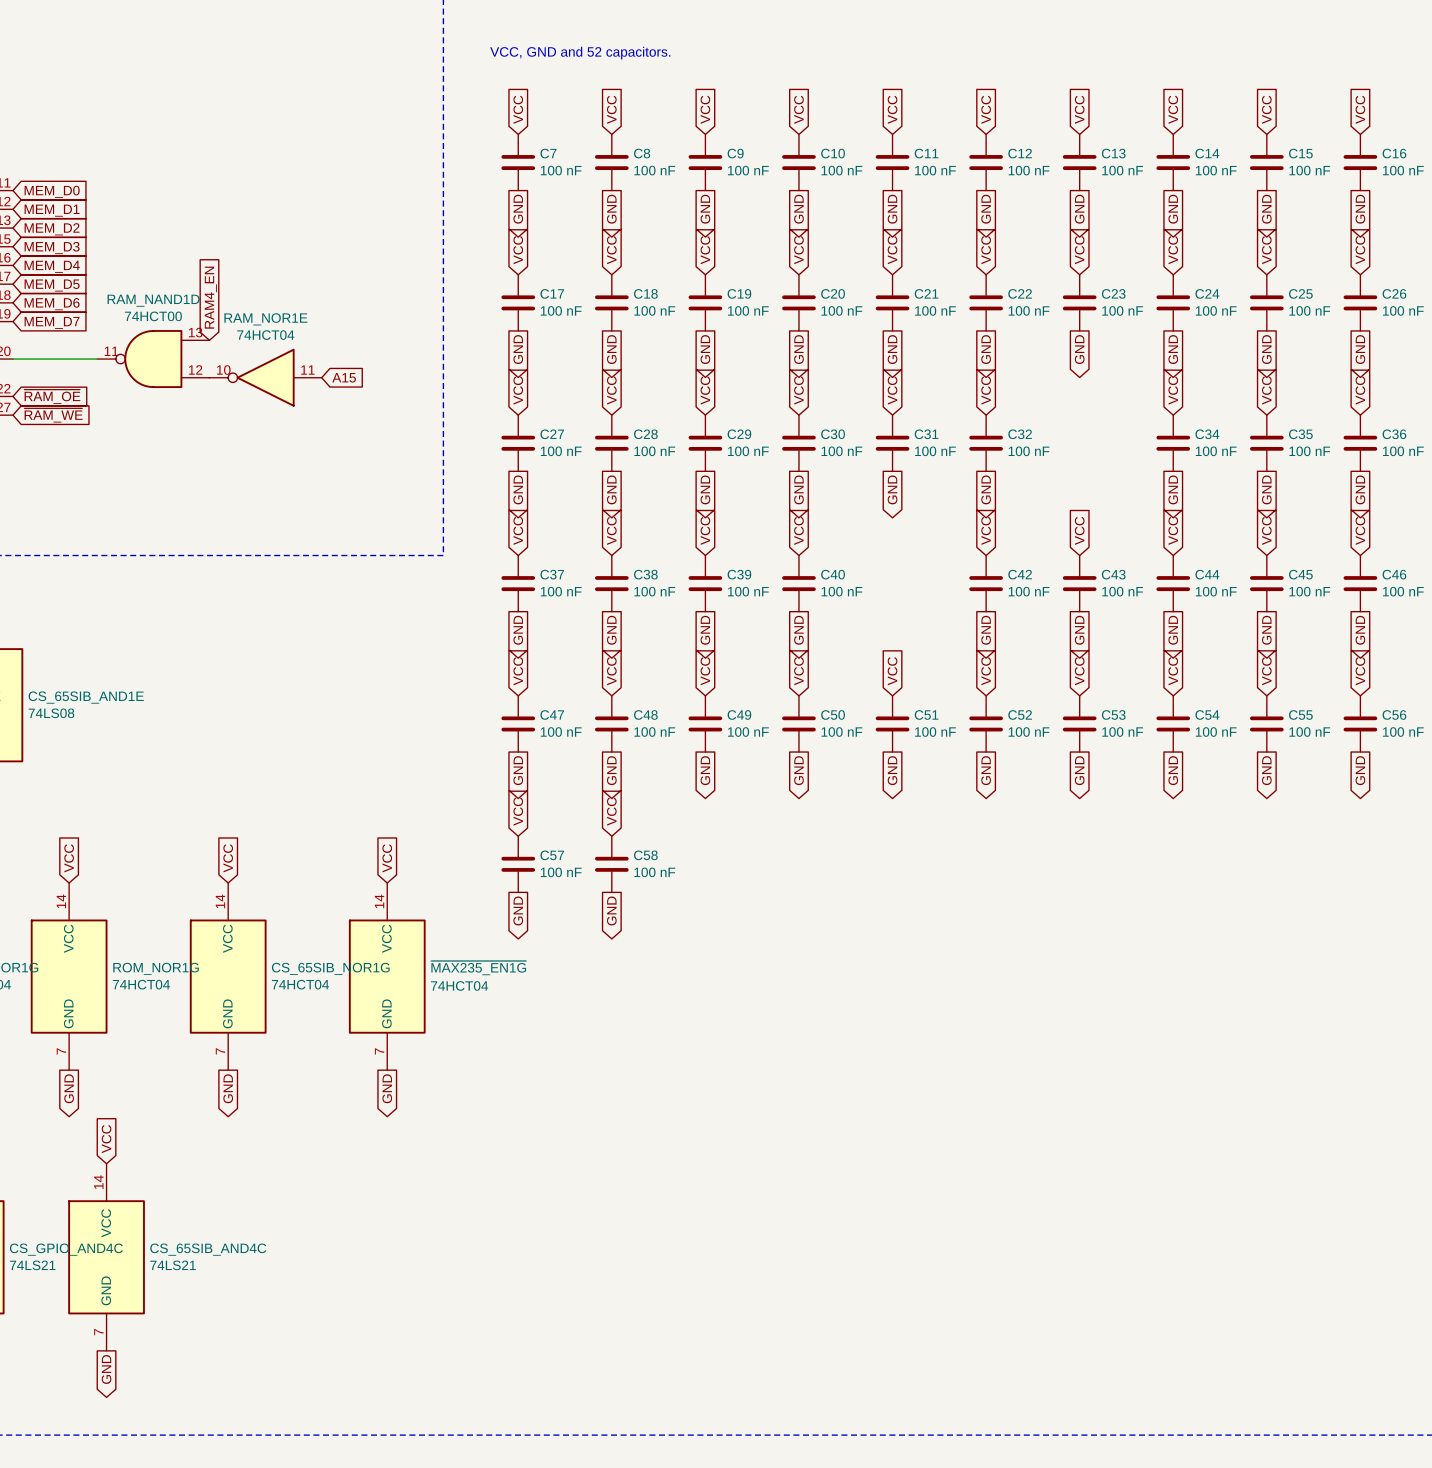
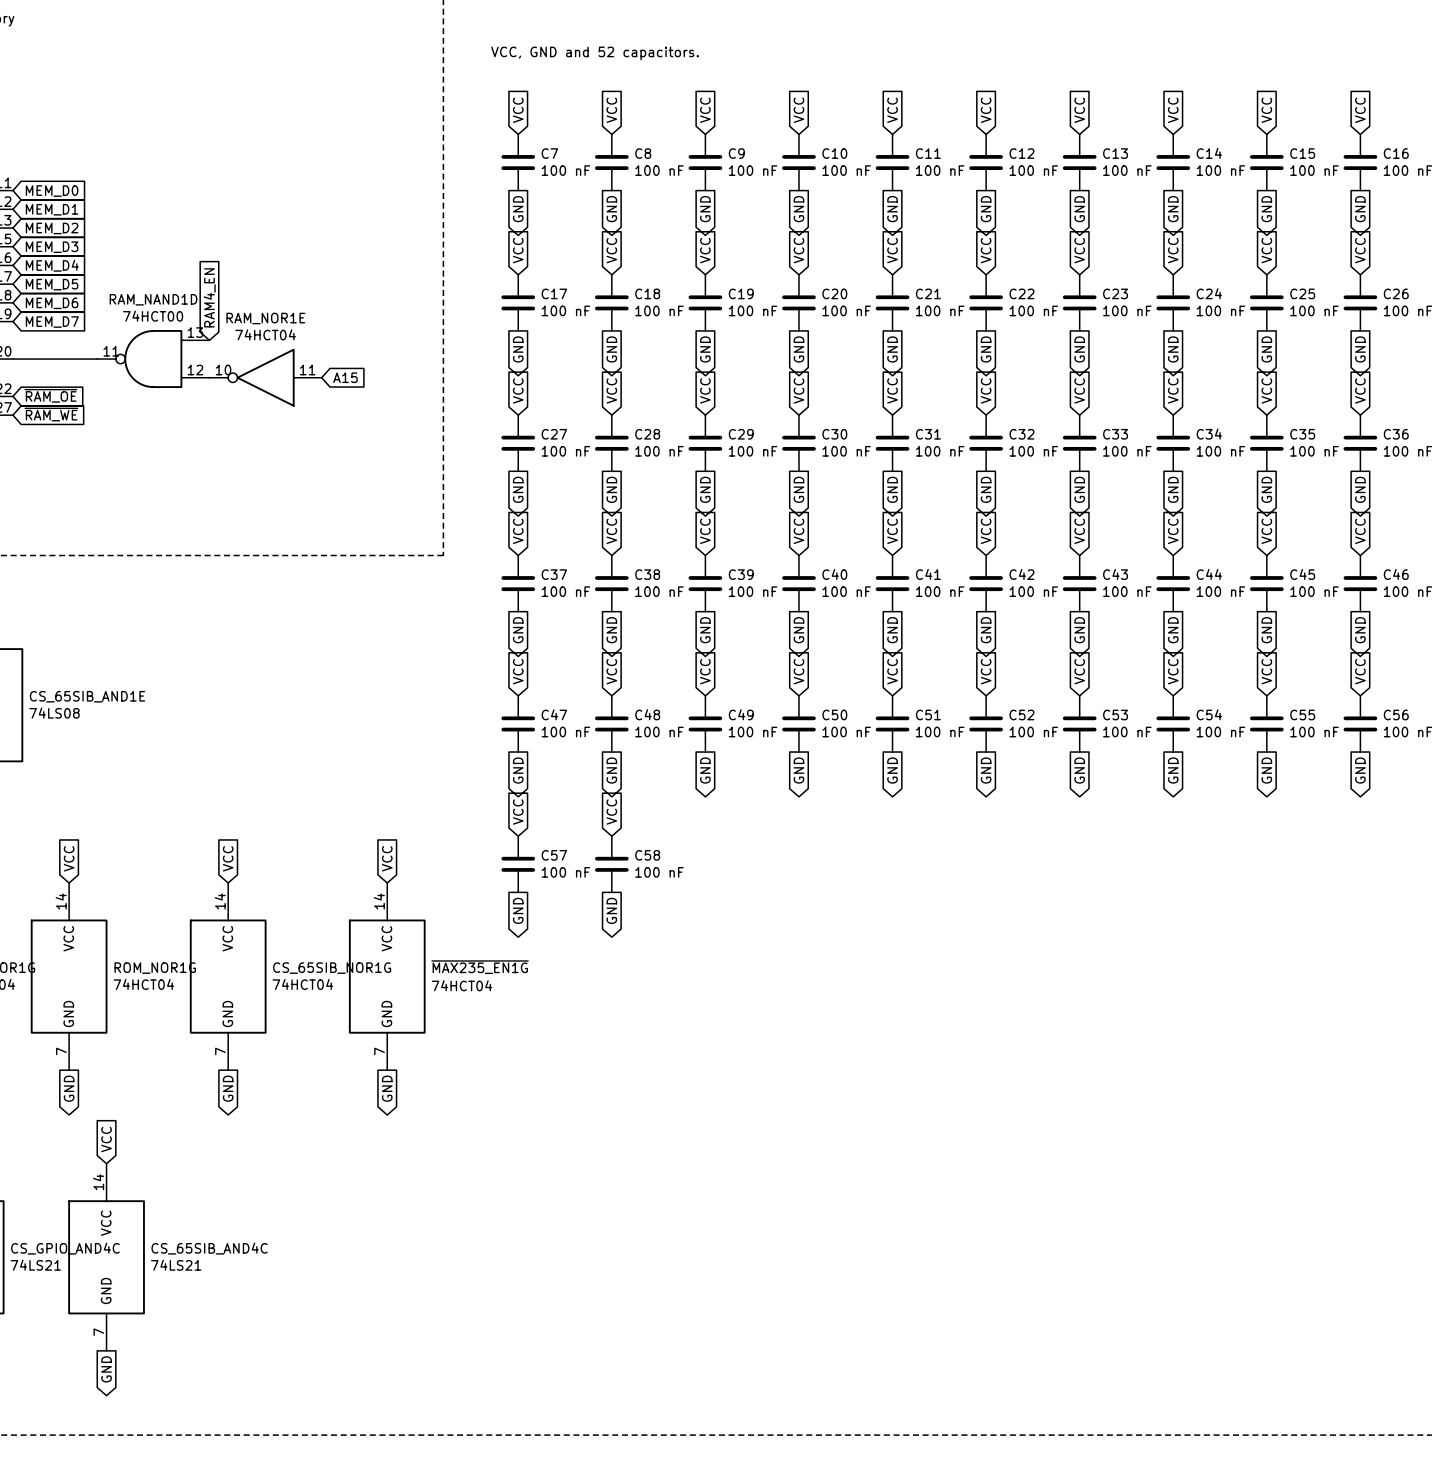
global label: none -> VCC (1079, 390)
C33: none -> 100 nF (1079, 443)
global label: none -> GND (1079, 489)
global label: none -> VCC (892, 531)
C41: none -> 100 nF (892, 583)
global label: none -> GND (892, 630)

